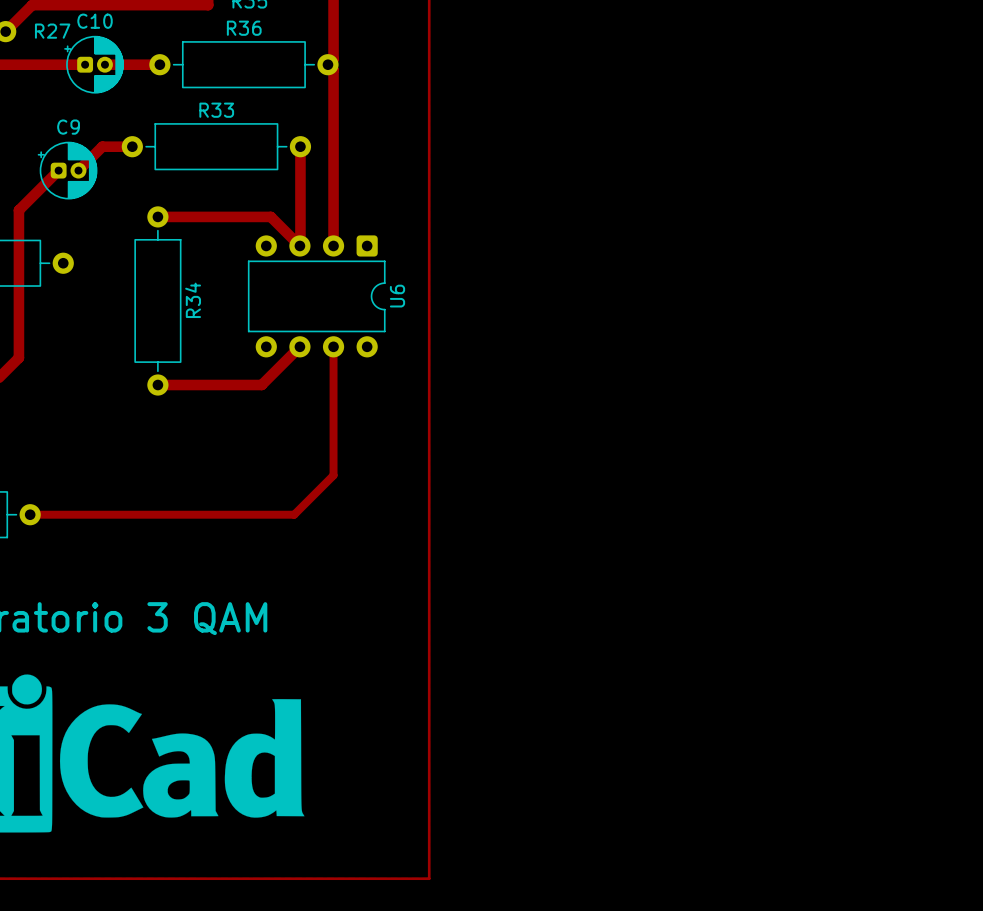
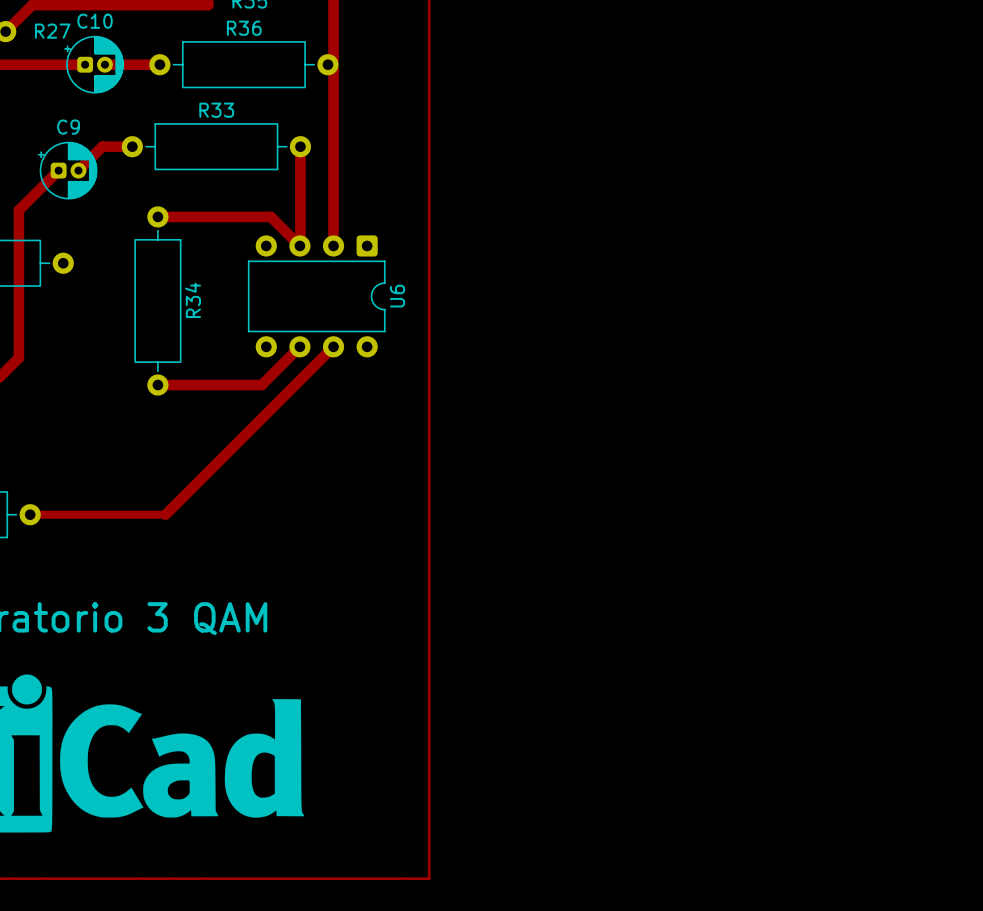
track: (333, 346) (333, 475) (294, 514) (165, 514) -> (333, 346) (165, 514)

